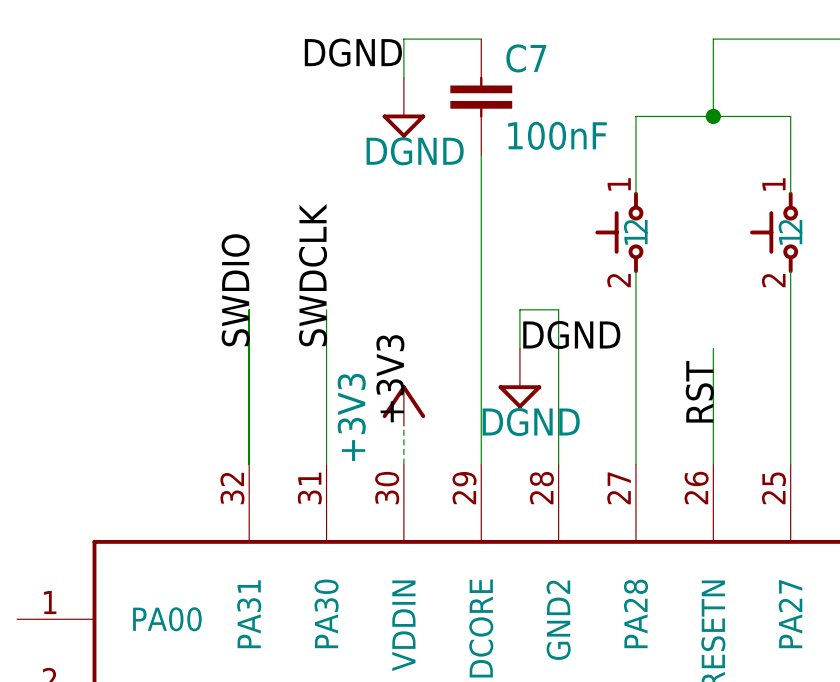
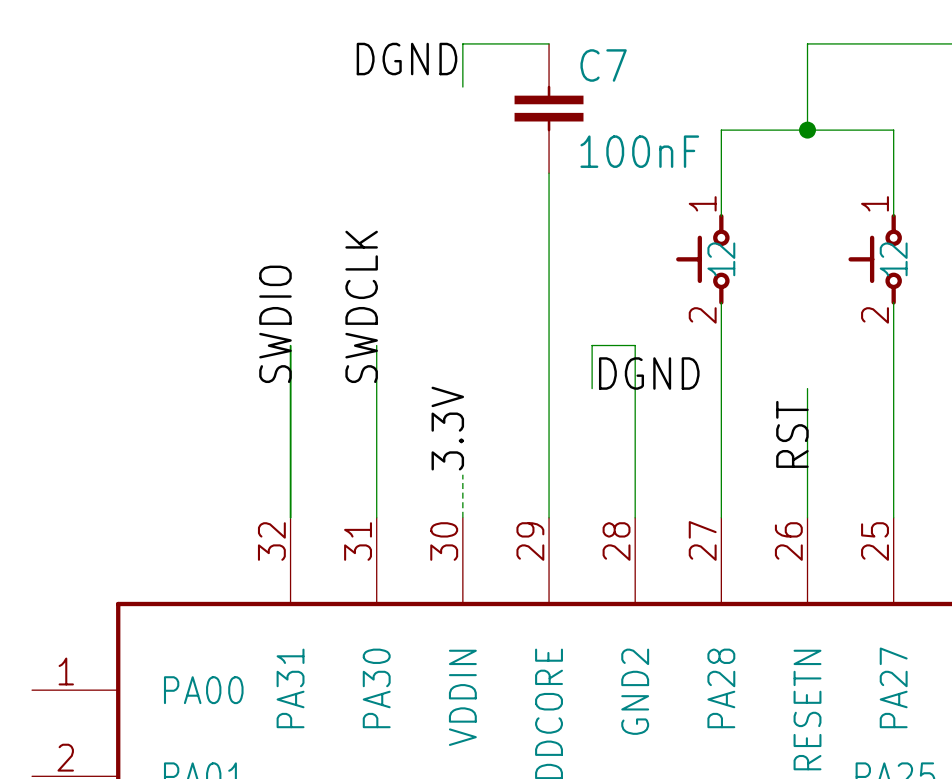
power symbol: DGND (403, 107) -> none
label: +3V3 (390, 378) -> 3.3V (447, 428)
power symbol: DGND (519, 378) -> none
power symbol: +3V3 (403, 405) -> none

